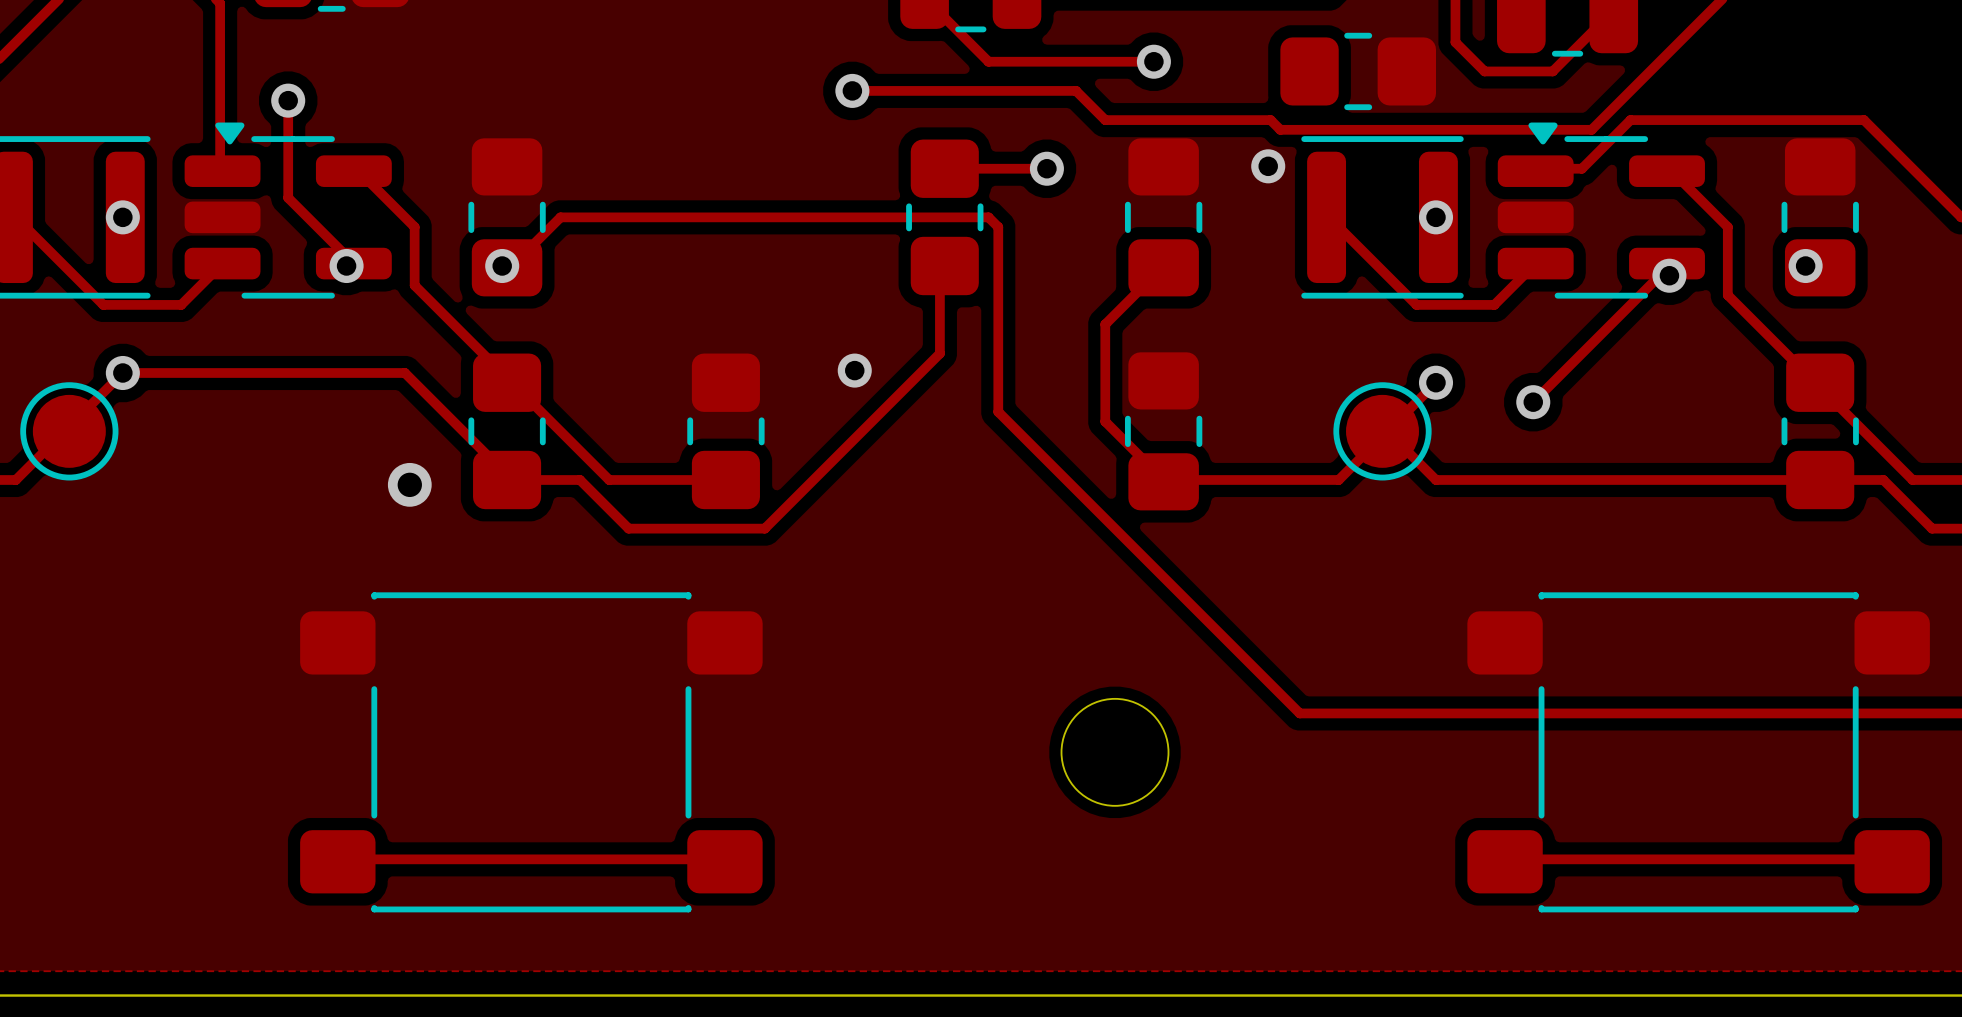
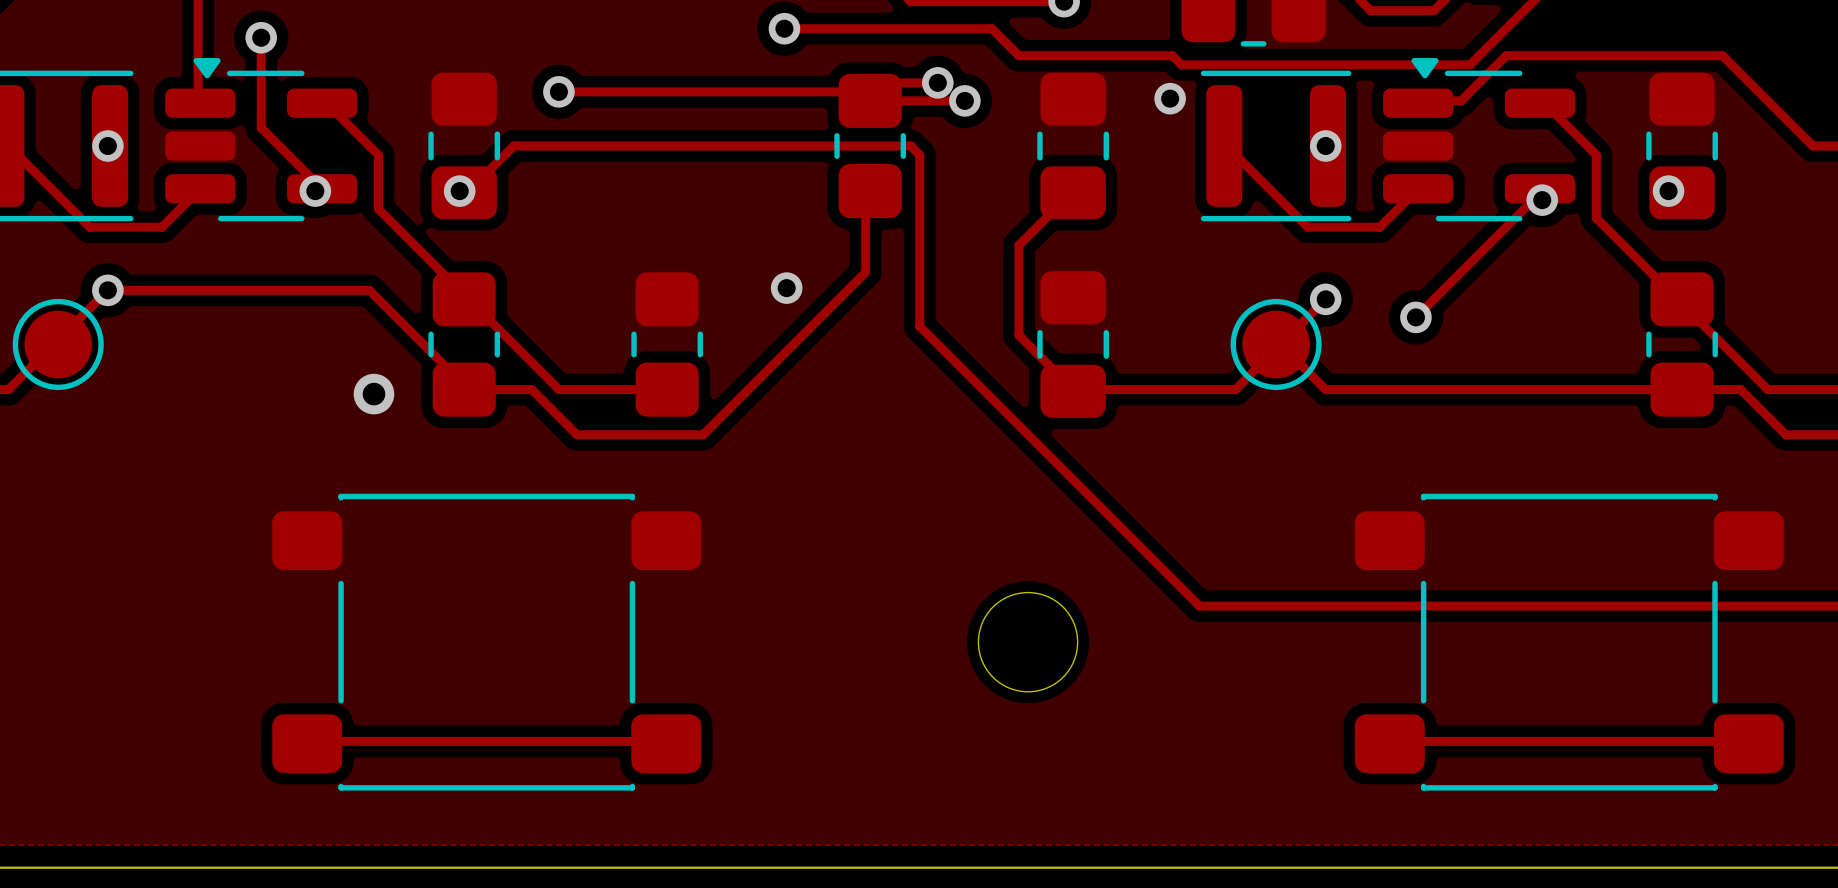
track: none -> (937, 82) (883, 82) (865, 100) (856, 91) (558, 91)
via: none -> (937, 82)
via: none -> (558, 91)

